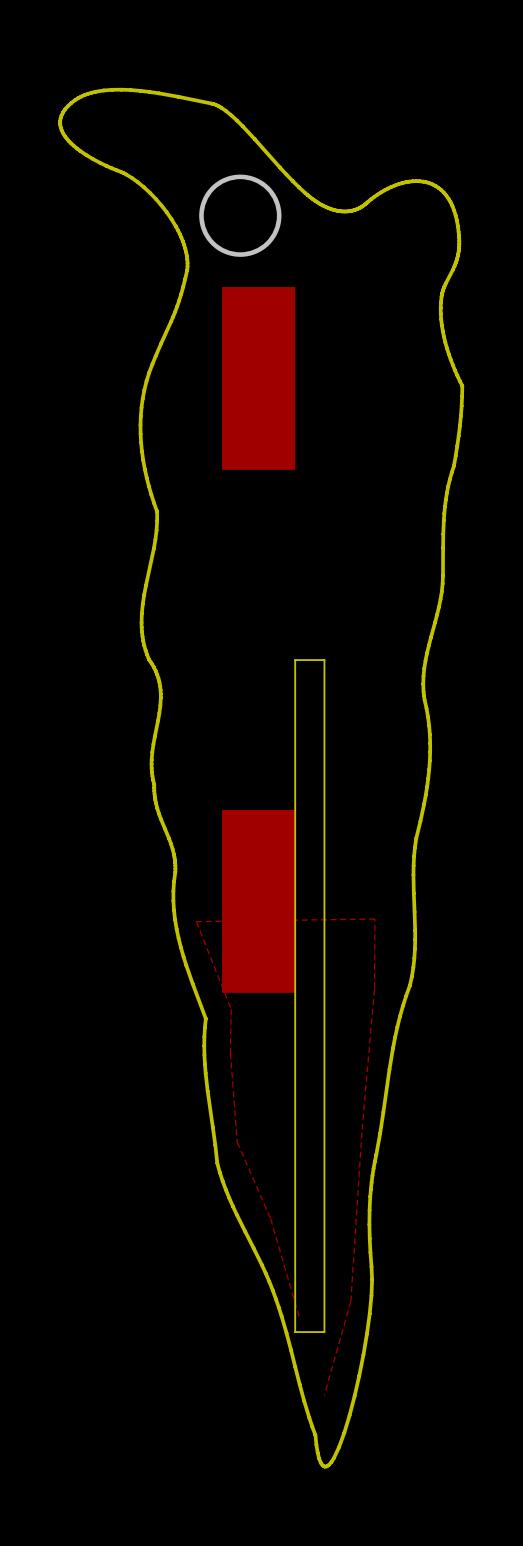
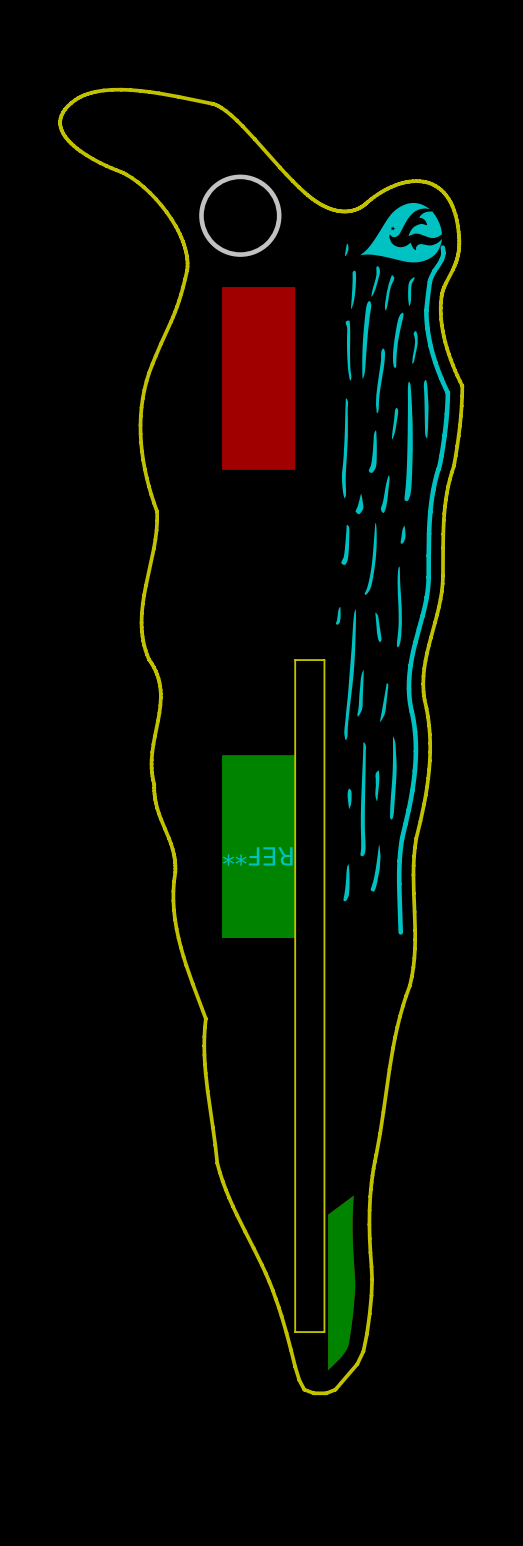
drawing: none -> [335, 202, 442, 902]
line: none -> (442, 247) (442, 258) (430, 280) (426, 314) (432, 352) (447, 392) (447, 407) (442, 452) (430, 508) (427, 593) (409, 674) (409, 696) (414, 730) (415, 757) (412, 790) (400, 854) (400, 932)
REF**: none -> (258, 846)
part: (258, 901) -> none
top zone outline: (374, 919) (374, 988) (362, 1129) (350, 1301) (323, 1399) (270, 1218) (237, 1142) (230, 1052) (231, 1009) (196, 921) (374, 919) -> none
drawing: none -> [328, 1195, 356, 1371]
board edge: (366, 1333) (349, 1415) (339, 1447) (331, 1462) (326, 1466) (322, 1465) (319, 1458) (315, 1435) (295, 1367) -> (366, 1333) (363, 1351) (357, 1364) (335, 1389) (326, 1393) (313, 1393) (304, 1389) (295, 1367)

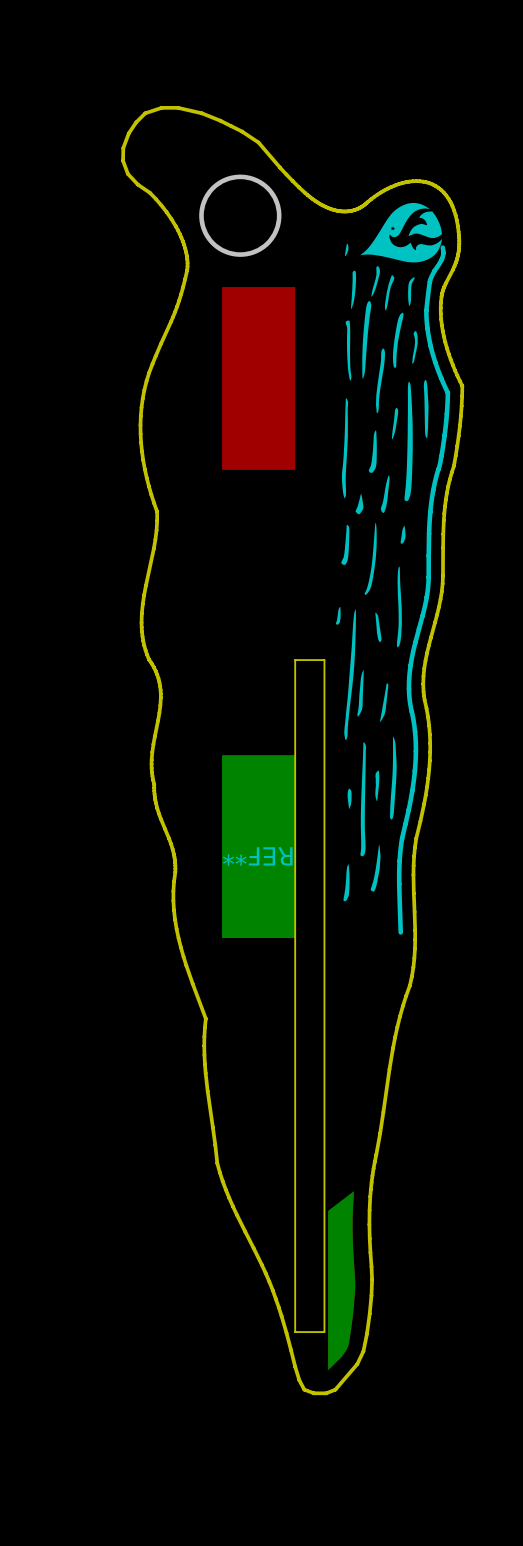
board edge: (280, 167) (237, 120) (214, 104) (159, 93) (121, 89) (91, 92) (71, 103) (62, 112) (60, 121) (61, 130) (68, 141) (93, 159) (132, 178) (150, 192) -> (280, 167) (258, 142) (242, 131) (201, 113) (178, 107) (161, 107) (145, 113) (136, 122) (128, 133) (123, 148) (123, 160) (127, 174) (137, 184) (150, 192)
drawing: none -> [328, 1191, 356, 1371]
drawing: [328, 1195, 356, 1371] -> none

